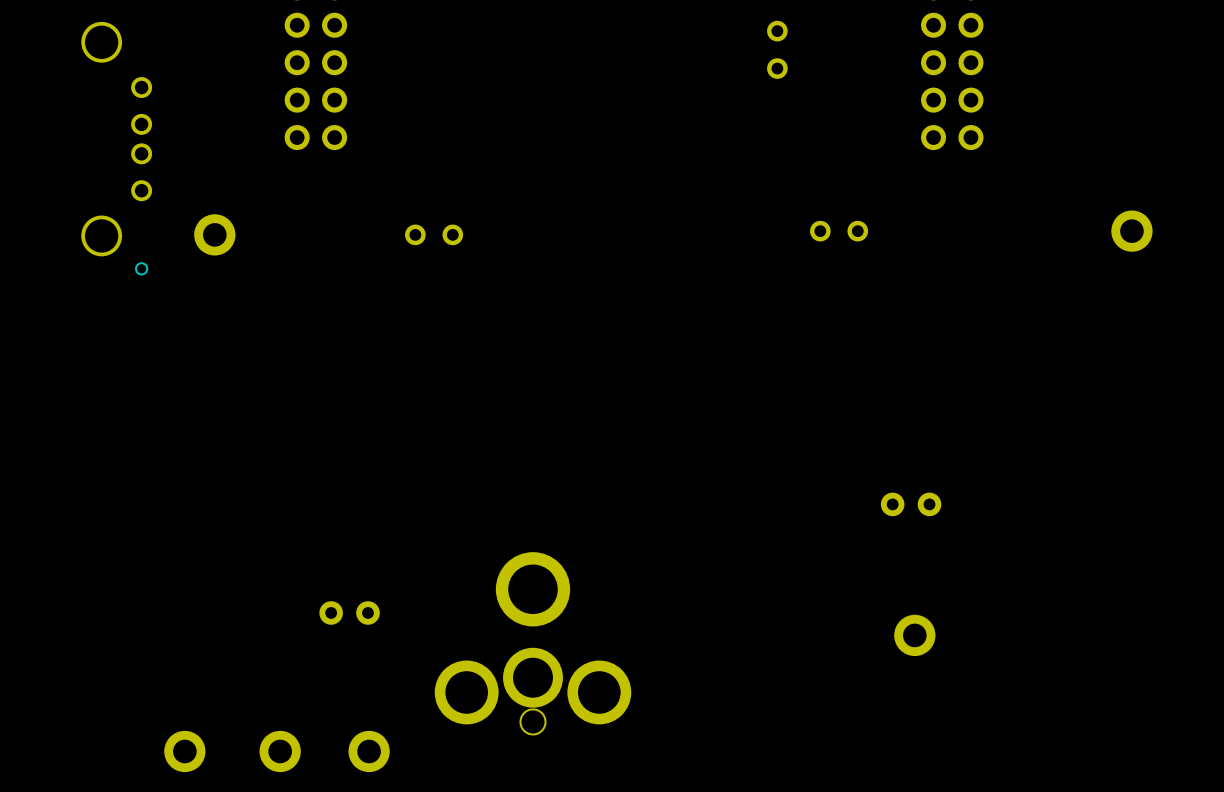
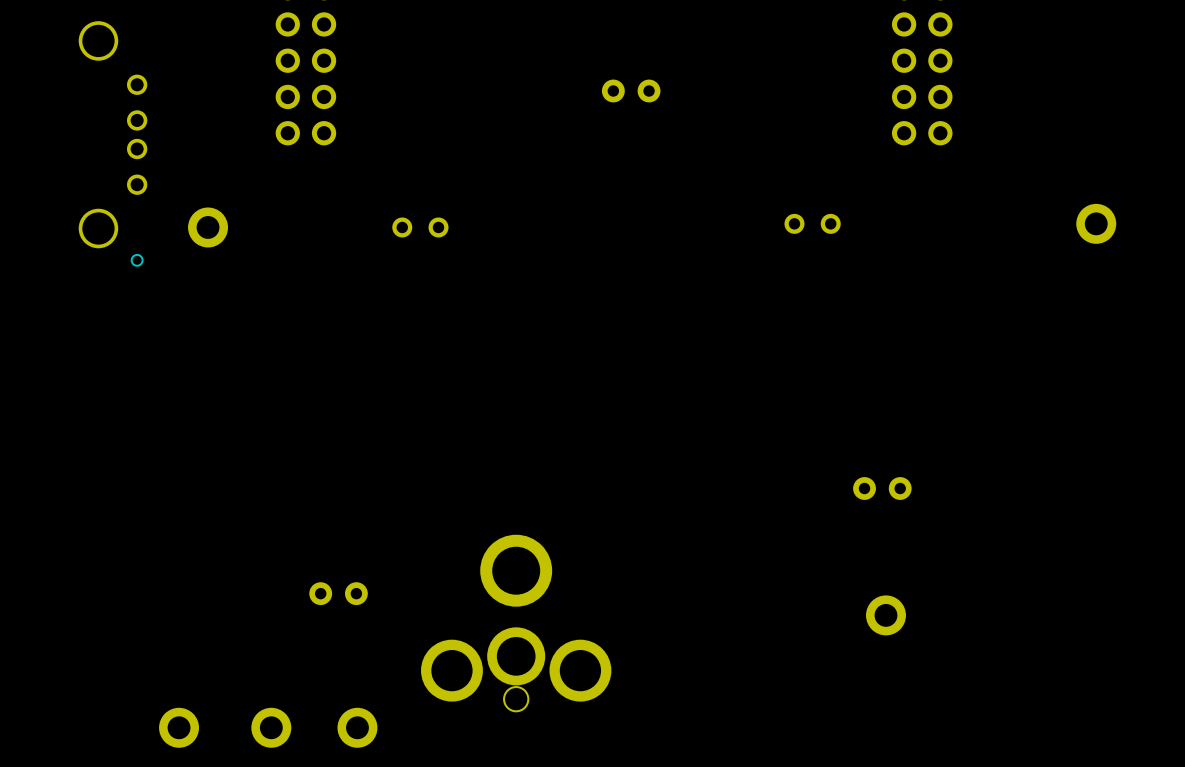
part: (777, 49) -> none
part: none -> (631, 90)

